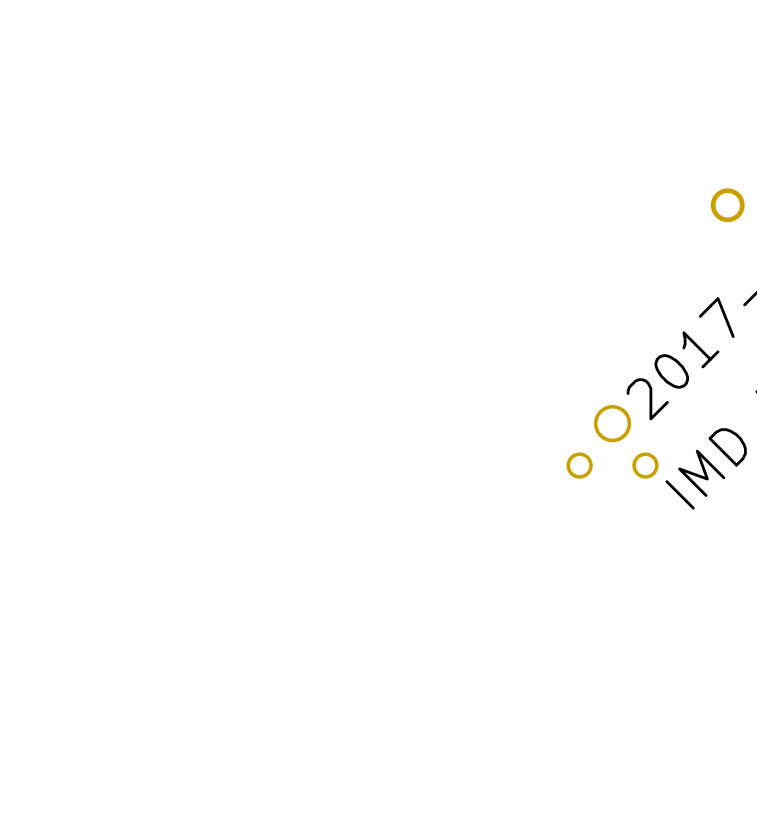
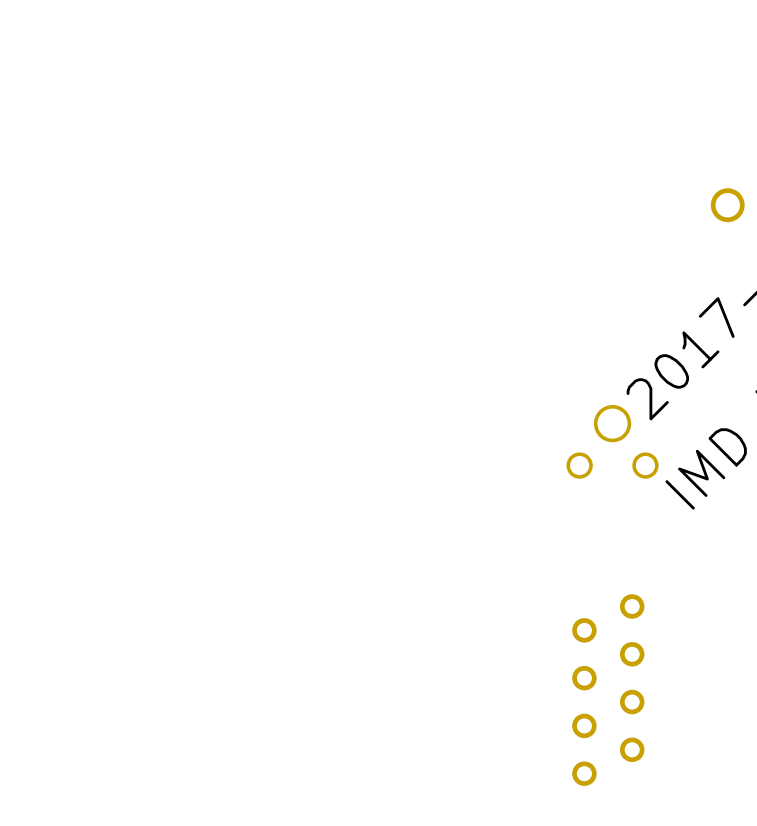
part: none -> (608, 690)

